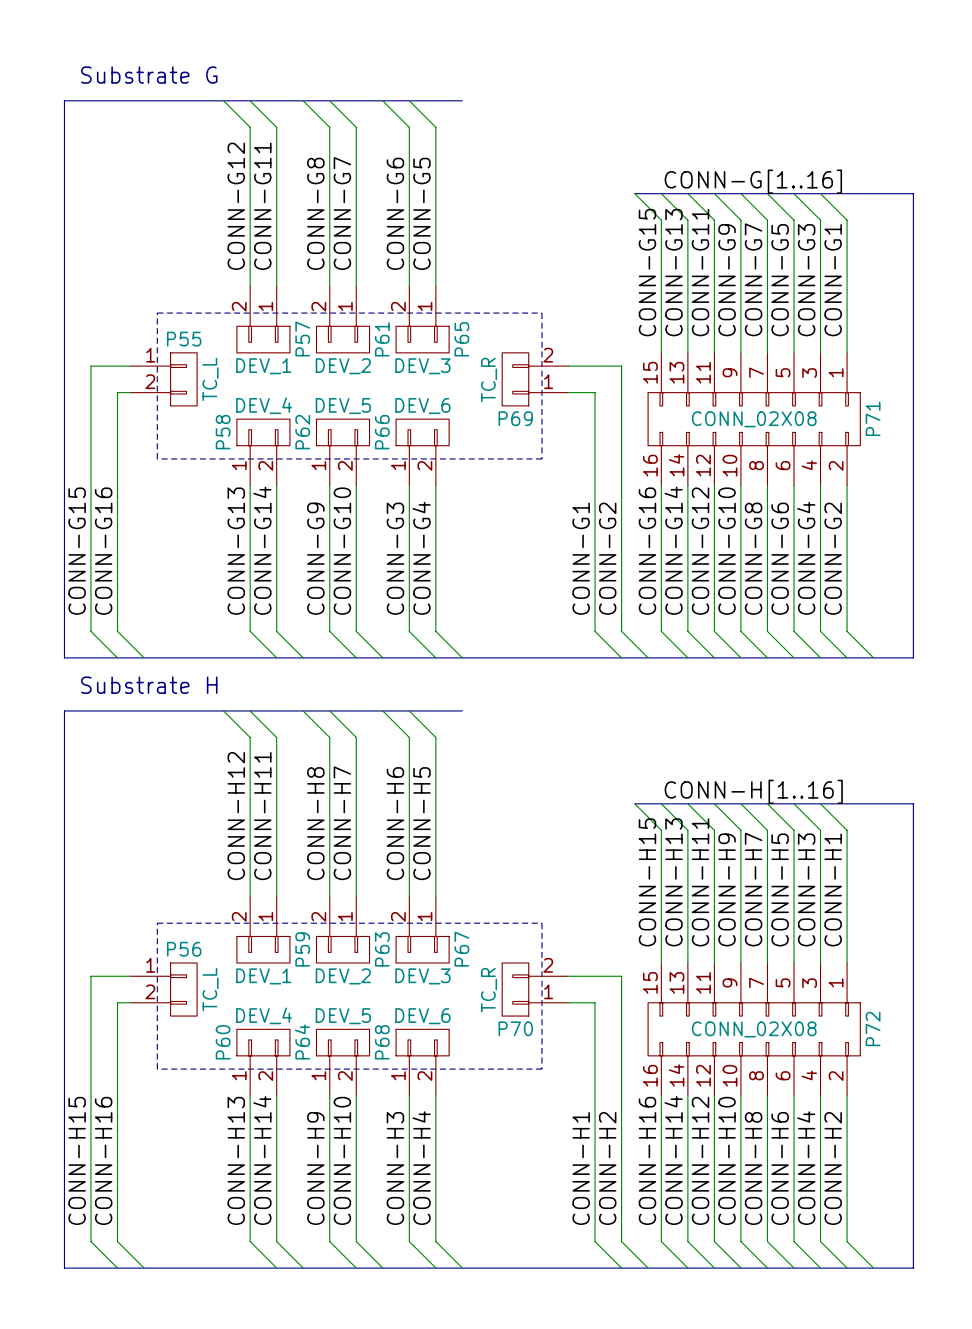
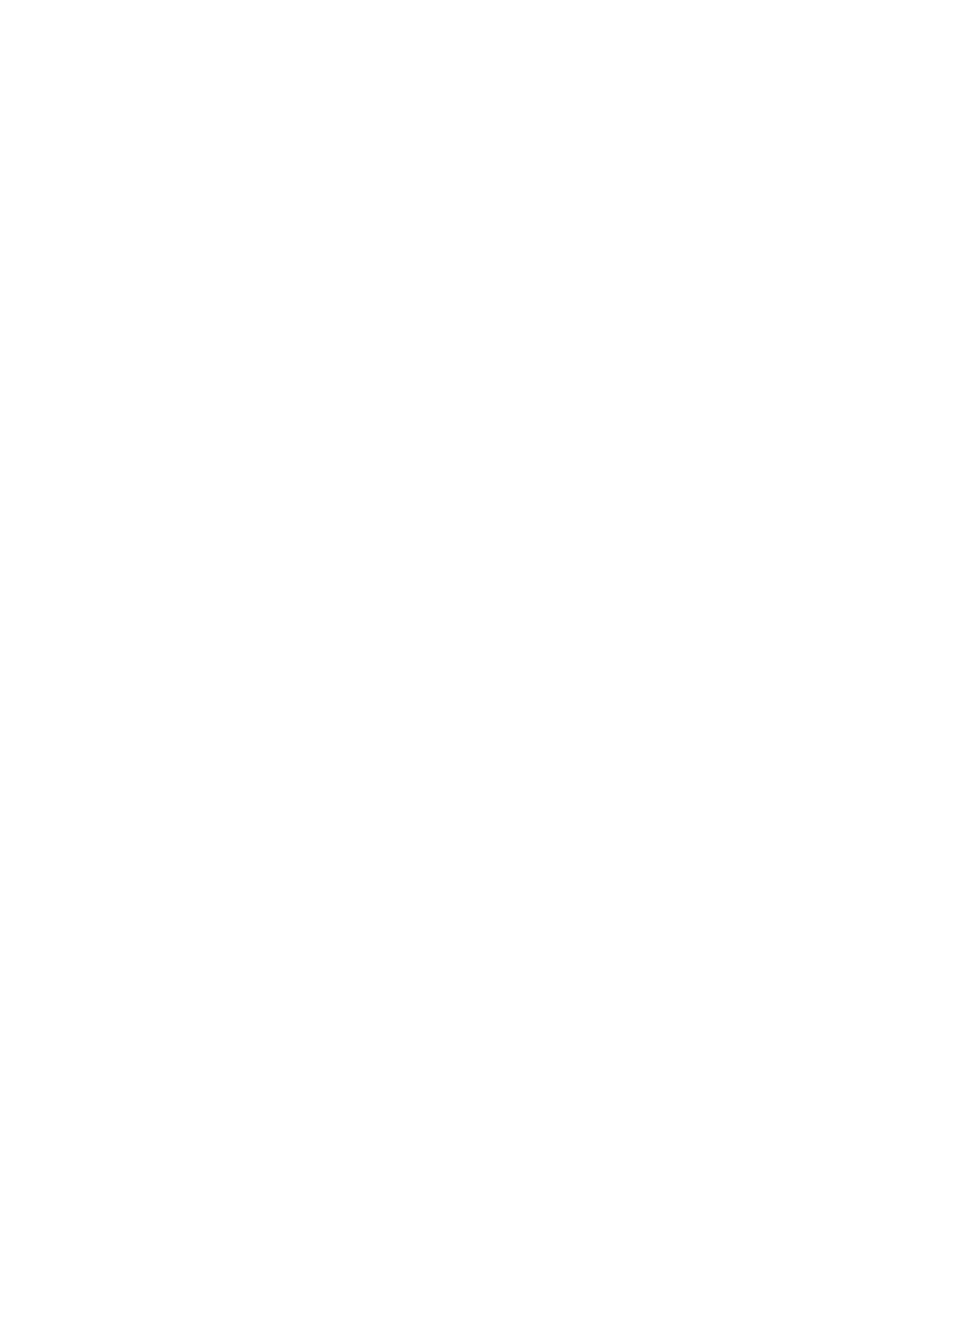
text: Substrate G (149, 75) -> none
wire: (223, 100) (250, 127) (250, 286) -> none
wire: (250, 100) (276, 127) (276, 286) -> none
wire: (303, 100) (329, 127) (329, 286) -> none
wire: (329, 100) (356, 127) (356, 286) -> none
wire: (382, 100) (409, 127) (409, 286) -> none
wire: (409, 100) (435, 127) (435, 286) -> none
bus: (462, 100) (64, 100) (64, 657) (913, 657) (913, 193) (634, 193) -> none
label: CONN-G[1..16] (753, 181) -> none
wire: (634, 193) (661, 220) (661, 352) -> none
wire: (661, 193) (687, 220) (687, 352) -> none
wire: (687, 193) (714, 220) (714, 352) -> none
wire: (714, 193) (740, 220) (740, 352) -> none
wire: (740, 193) (767, 220) (767, 352) -> none
wire: (767, 193) (794, 220) (794, 352) -> none
wire: (794, 193) (820, 220) (820, 352) -> none
wire: (820, 193) (847, 220) (847, 352) -> none
label: CONN-G12 (236, 206) -> none
label: CONN-G11 (262, 206) -> none
label: CONN-G8 (315, 213) -> none
label: CONN-G7 (342, 213) -> none
label: CONN-G6 (395, 213) -> none
label: CONN-G5 (421, 213) -> none
label: CONN-G15 (647, 272) -> none
label: CONN-G13 (674, 272) -> none
label: CONN-G11 (700, 272) -> none
label: CONN-G7 (753, 279) -> none
label: CONN-G9 (727, 280) -> none
label: CONN-G5 (780, 280) -> none
label: CONN-G3 (806, 280) -> none
label: CONN-G1 (833, 280) -> none
line: (157, 313) (541, 313) (541, 458) (157, 458) (157, 313) -> none
P57: (263, 319) -> none
P61: (343, 319) -> none
P65: (422, 319) -> none
wire: (130, 366) (90, 366) (90, 631) (117, 657) -> none
wire: (568, 366) (621, 366) (621, 631) (648, 657) -> none
P55: (163, 379) -> none
P69: (535, 379) -> none
wire: (130, 392) (117, 392) (117, 631) (144, 657) -> none
wire: (568, 392) (595, 392) (595, 631) (621, 657) -> none
P71: CONN_02X08 (754, 419) -> none
P58: (263, 452) -> none
P62: (343, 452) -> none
P66: (422, 452) -> none
wire: (250, 485) (250, 631) (276, 657) -> none
wire: (276, 485) (276, 631) (303, 657) -> none
wire: (329, 485) (329, 631) (356, 657) -> none
wire: (356, 485) (356, 631) (382, 657) -> none
wire: (409, 485) (409, 631) (435, 657) -> none
wire: (435, 485) (435, 631) (462, 657) -> none
wire: (661, 485) (661, 631) (687, 657) -> none
wire: (687, 485) (687, 631) (714, 657) -> none
wire: (714, 485) (714, 631) (740, 657) -> none
wire: (740, 485) (740, 631) (767, 657) -> none
wire: (767, 485) (767, 631) (794, 657) -> none
wire: (794, 485) (794, 631) (820, 657) -> none
wire: (820, 485) (820, 631) (847, 657) -> none
wire: (847, 485) (847, 631) (873, 657) -> none
label: CONN-G14 (262, 550) -> none
label: CONN-G14 (673, 550) -> none
label: CONN-G15 (77, 551) -> none
label: CONN-G16 (103, 551) -> none
label: CONN-G13 (236, 551) -> none
label: CONN-G10 (342, 551) -> none
label: CONN-G16 (647, 551) -> none
label: CONN-G12 (700, 551) -> none
label: CONN-G10 (727, 551) -> none
label: CONN-G9 (315, 558) -> none
label: CONN-G3 (395, 558) -> none
label: CONN-G4 (421, 558) -> none
label: CONN-G1 (581, 558) -> none
label: CONN-G2 (607, 558) -> none
label: CONN-G8 (753, 558) -> none
label: CONN-G6 (780, 558) -> none
label: CONN-G4 (806, 558) -> none
label: CONN-G2 (833, 558) -> none
text: Substrate H (149, 685) -> none
wire: (223, 710) (250, 737) (250, 896) -> none
wire: (250, 710) (276, 737) (276, 896) -> none
wire: (303, 710) (329, 737) (329, 896) -> none
wire: (329, 710) (356, 737) (356, 896) -> none
wire: (382, 710) (409, 737) (409, 896) -> none
wire: (409, 710) (435, 737) (435, 896) -> none
bus: (462, 710) (64, 710) (64, 1268) (913, 1268) (913, 803) (634, 803) -> none
label: CONN-H[1..16] (753, 791) -> none
wire: (634, 803) (661, 830) (661, 963) -> none
wire: (661, 803) (687, 830) (687, 963) -> none
wire: (687, 803) (714, 830) (714, 963) -> none
wire: (714, 803) (740, 830) (740, 963) -> none
wire: (740, 803) (767, 830) (767, 963) -> none
wire: (767, 803) (794, 830) (794, 963) -> none
wire: (794, 803) (820, 830) (820, 963) -> none
wire: (820, 803) (847, 830) (847, 963) -> none
label: CONN-H12 (236, 816) -> none
label: CONN-H11 (262, 816) -> none
label: CONN-H8 (315, 823) -> none
label: CONN-H7 (342, 823) -> none
label: CONN-H6 (395, 823) -> none
label: CONN-H5 (421, 823) -> none
label: CONN-H15 (647, 882) -> none
label: CONN-H13 (674, 882) -> none
label: CONN-H11 (700, 882) -> none
label: CONN-H9 (727, 889) -> none
label: CONN-H7 (753, 889) -> none
label: CONN-H5 (780, 889) -> none
label: CONN-H3 (806, 889) -> none
label: CONN-H1 (833, 889) -> none
line: (157, 923) (157, 1069) (541, 1069) (541, 923) (157, 923) -> none
P59: (263, 929) -> none
P63: (343, 929) -> none
P67: (422, 929) -> none
wire: (130, 976) (90, 976) (90, 1241) (117, 1268) -> none
wire: (568, 976) (621, 976) (621, 1241) (648, 1268) -> none
P56: (163, 989) -> none
P70: (535, 989) -> none
wire: (130, 1002) (117, 1002) (117, 1241) (144, 1268) -> none
wire: (568, 1002) (595, 1002) (595, 1241) (621, 1268) -> none
P72: CONN_02X08 (754, 1029) -> none
P60: (263, 1062) -> none
P64: (343, 1062) -> none
P68: (422, 1062) -> none
wire: (250, 1095) (250, 1241) (276, 1268) -> none
wire: (276, 1095) (276, 1241) (303, 1268) -> none
wire: (329, 1095) (329, 1241) (356, 1268) -> none
wire: (356, 1095) (356, 1241) (382, 1268) -> none
wire: (409, 1095) (409, 1241) (435, 1268) -> none
wire: (435, 1095) (435, 1241) (462, 1268) -> none
wire: (661, 1095) (661, 1241) (687, 1268) -> none
wire: (687, 1095) (687, 1241) (714, 1268) -> none
wire: (714, 1095) (714, 1241) (740, 1268) -> none
wire: (740, 1095) (740, 1241) (767, 1268) -> none
wire: (767, 1095) (767, 1241) (794, 1268) -> none
wire: (794, 1095) (794, 1241) (820, 1268) -> none
wire: (820, 1095) (820, 1241) (847, 1268) -> none
wire: (847, 1095) (847, 1241) (873, 1268) -> none
label: CONN-H15 (77, 1160) -> none
label: CONN-H16 (103, 1160) -> none
label: CONN-H13 (236, 1160) -> none
label: CONN-H14 (262, 1160) -> none
label: CONN-H10 (342, 1160) -> none
label: CONN-H16 (647, 1160) -> none
label: CONN-H14 (673, 1160) -> none
label: CONN-H12 (700, 1160) -> none
label: CONN-H10 (727, 1160) -> none
label: CONN-H9 (315, 1168) -> none
label: CONN-H3 (395, 1168) -> none
label: CONN-H4 (421, 1168) -> none
label: CONN-H1 (581, 1168) -> none
label: CONN-H2 (607, 1168) -> none
label: CONN-H8 (753, 1168) -> none
label: CONN-H6 (780, 1168) -> none
label: CONN-H4 (806, 1168) -> none
label: CONN-H2 (833, 1168) -> none

